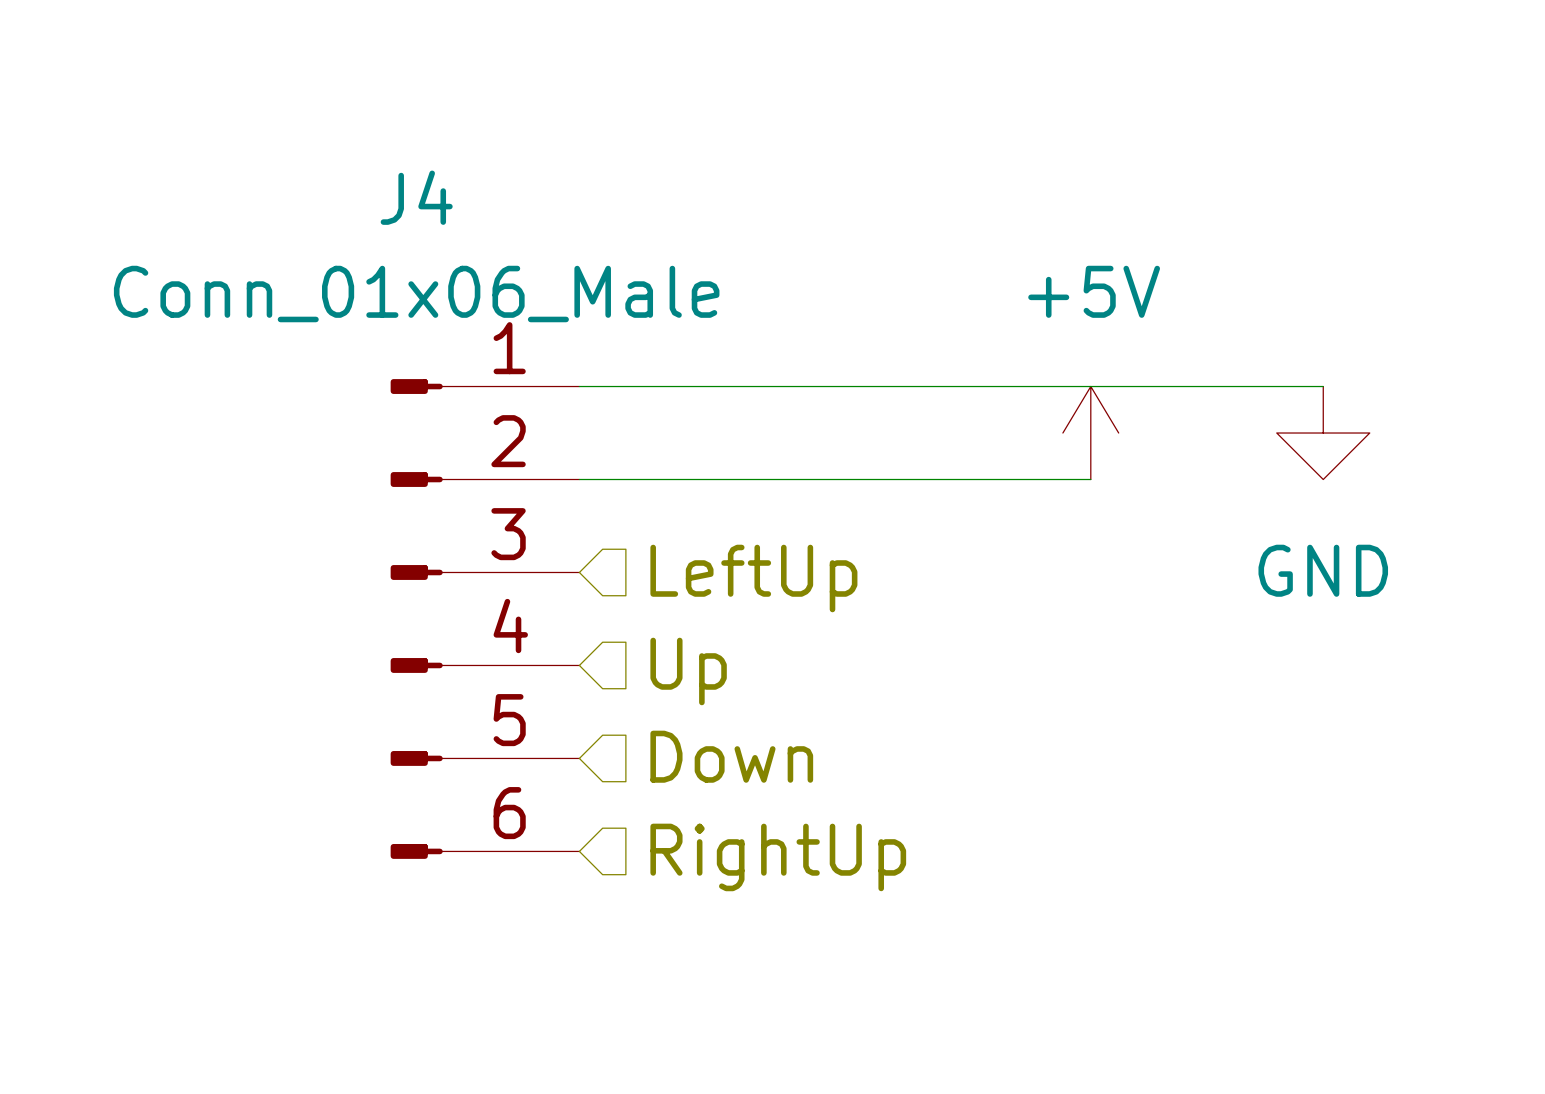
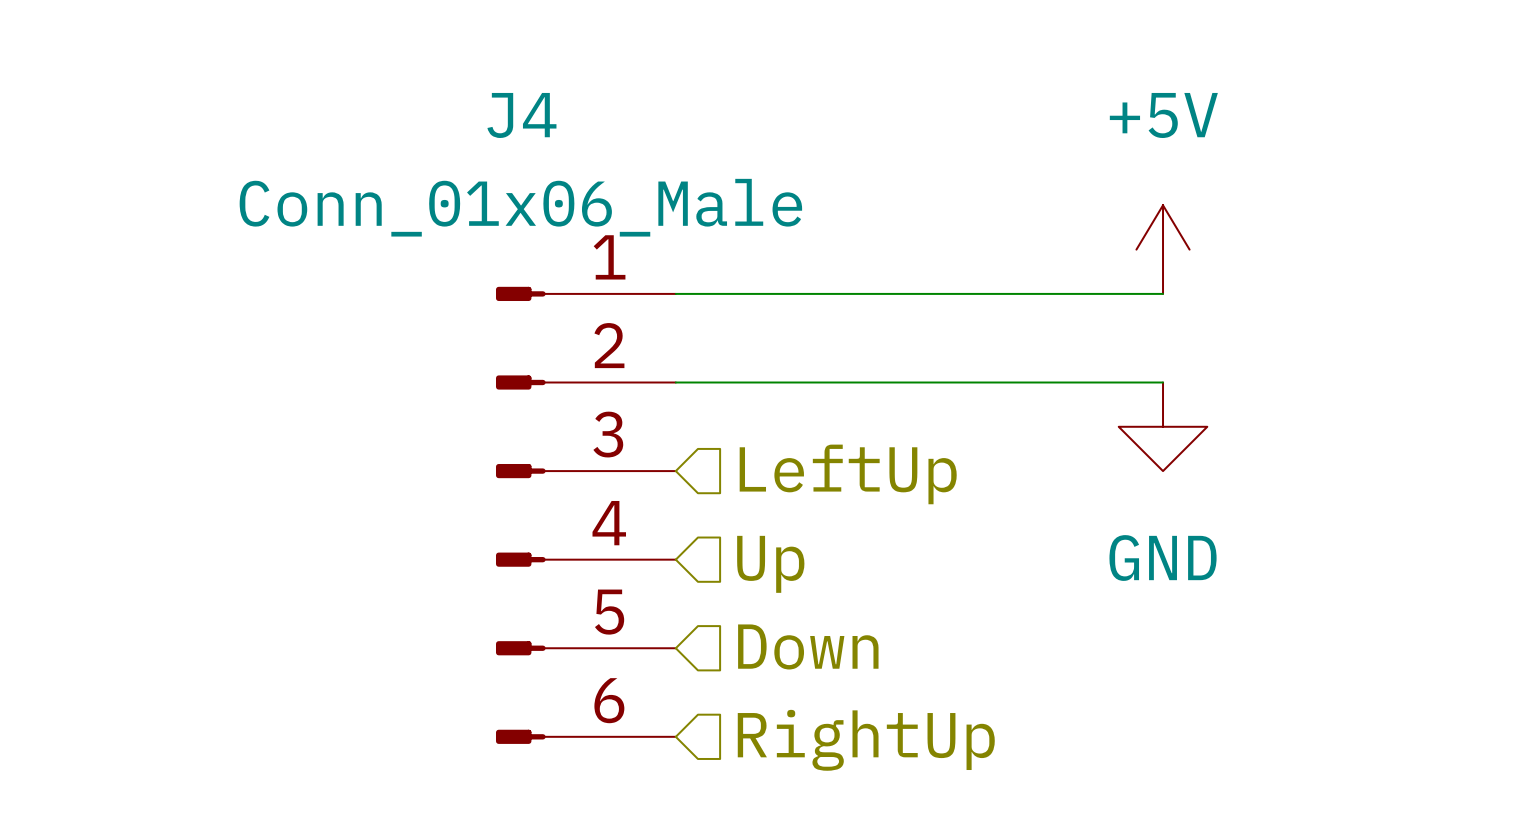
wire: (1090, 386) (1323, 386) -> none
power symbol position: +5V (1090, 433) -> +5V (1163, 249)
power symbol position: GND (1323, 433) -> GND (1163, 426)

